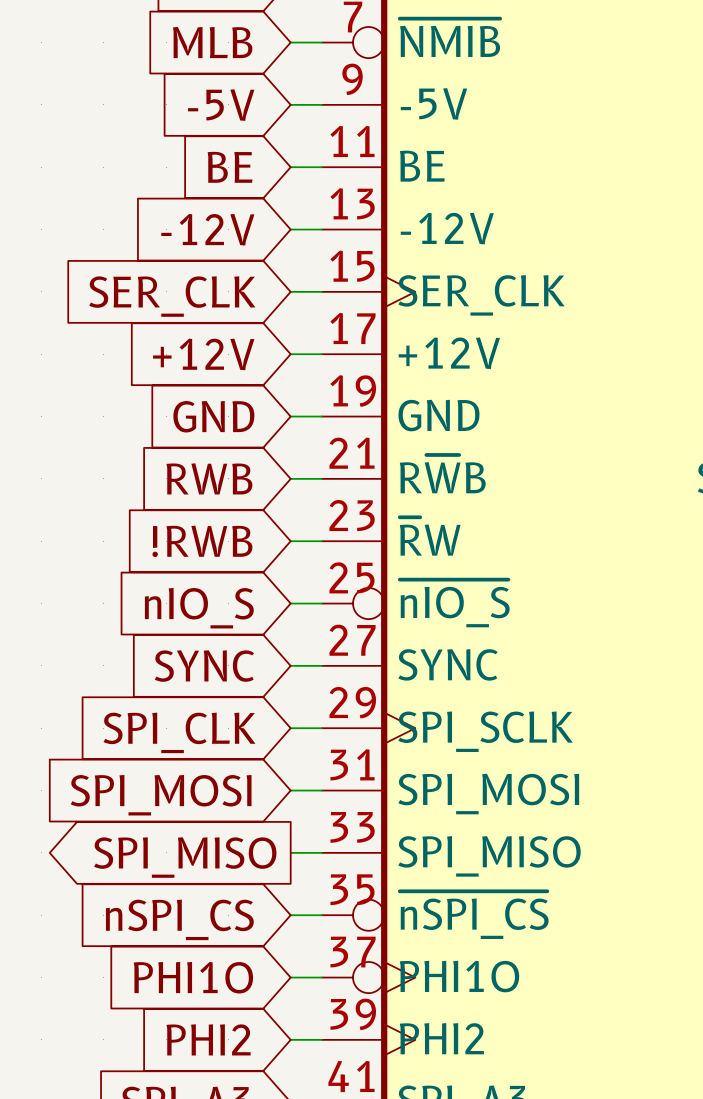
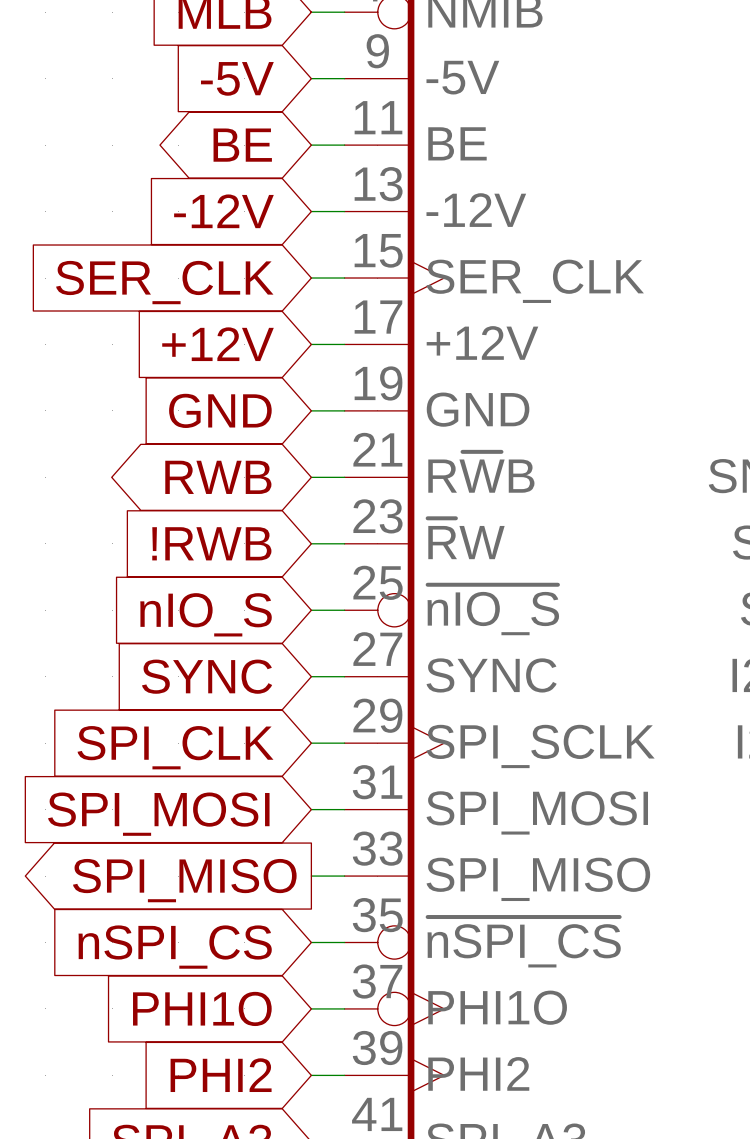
global label shape: input (230, 167) -> bidirectional (242, 145)
global label shape: input (209, 478) -> bidirectional (218, 477)

